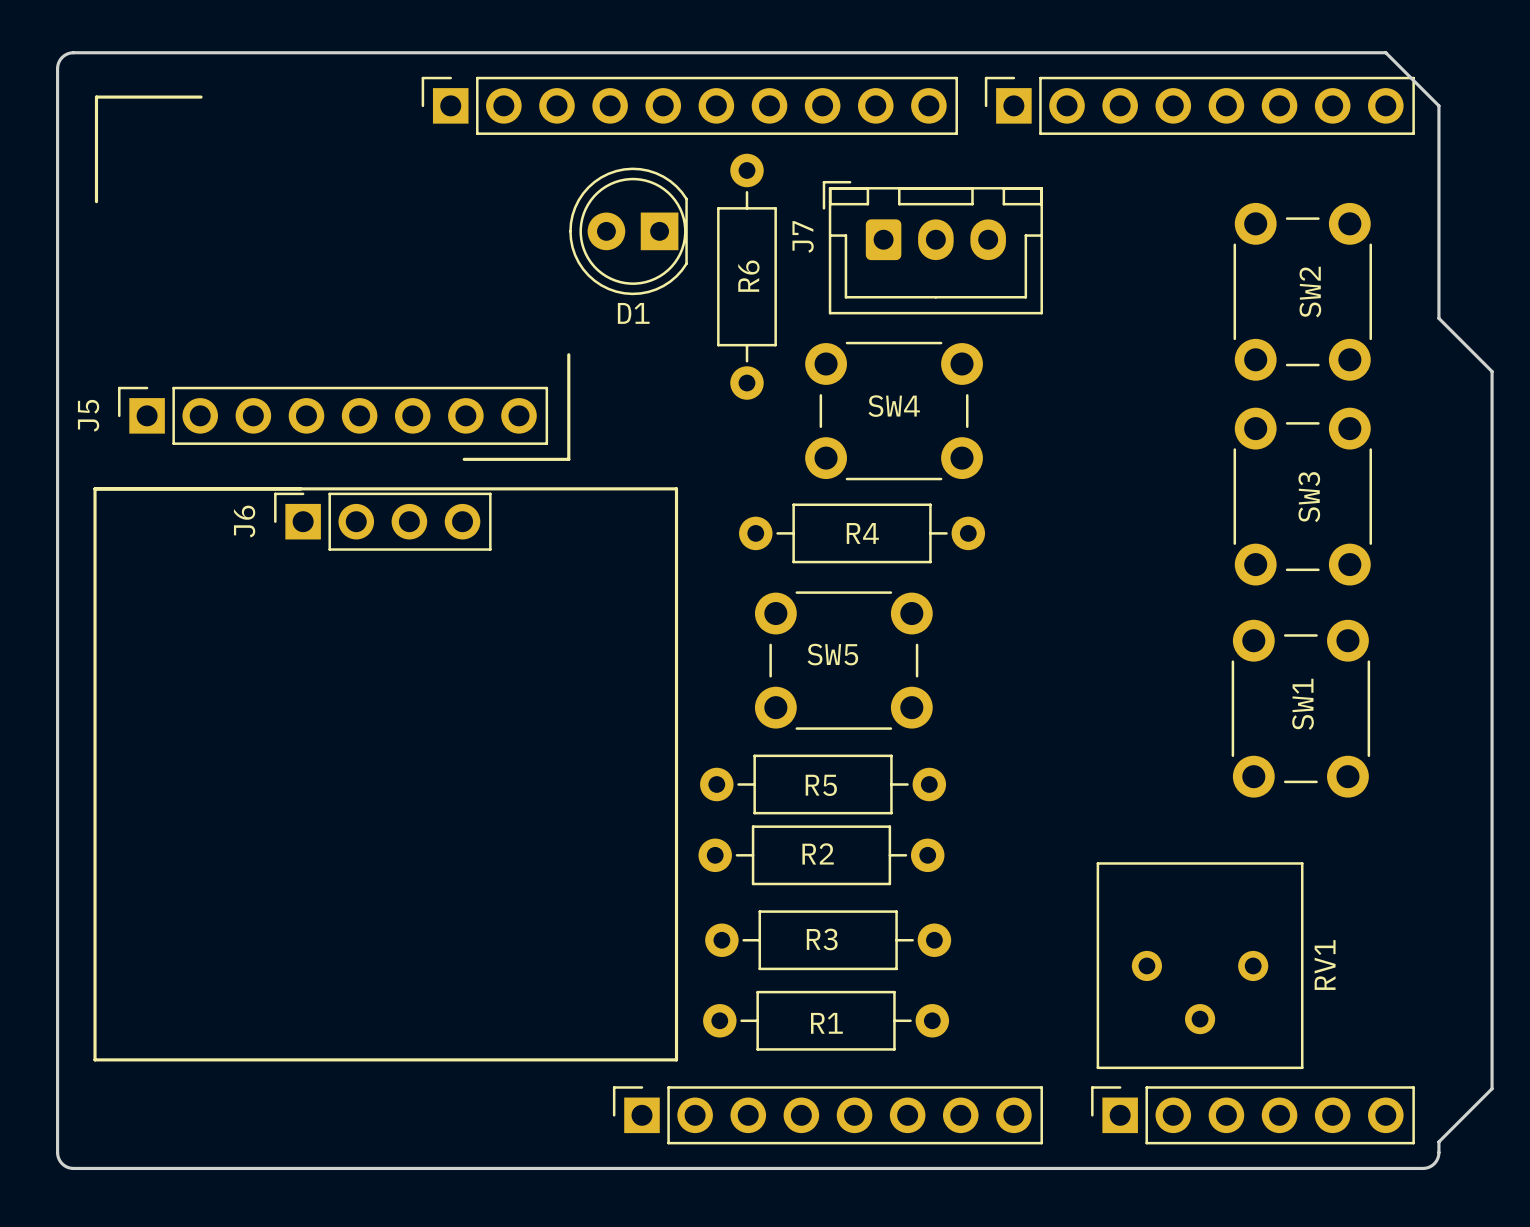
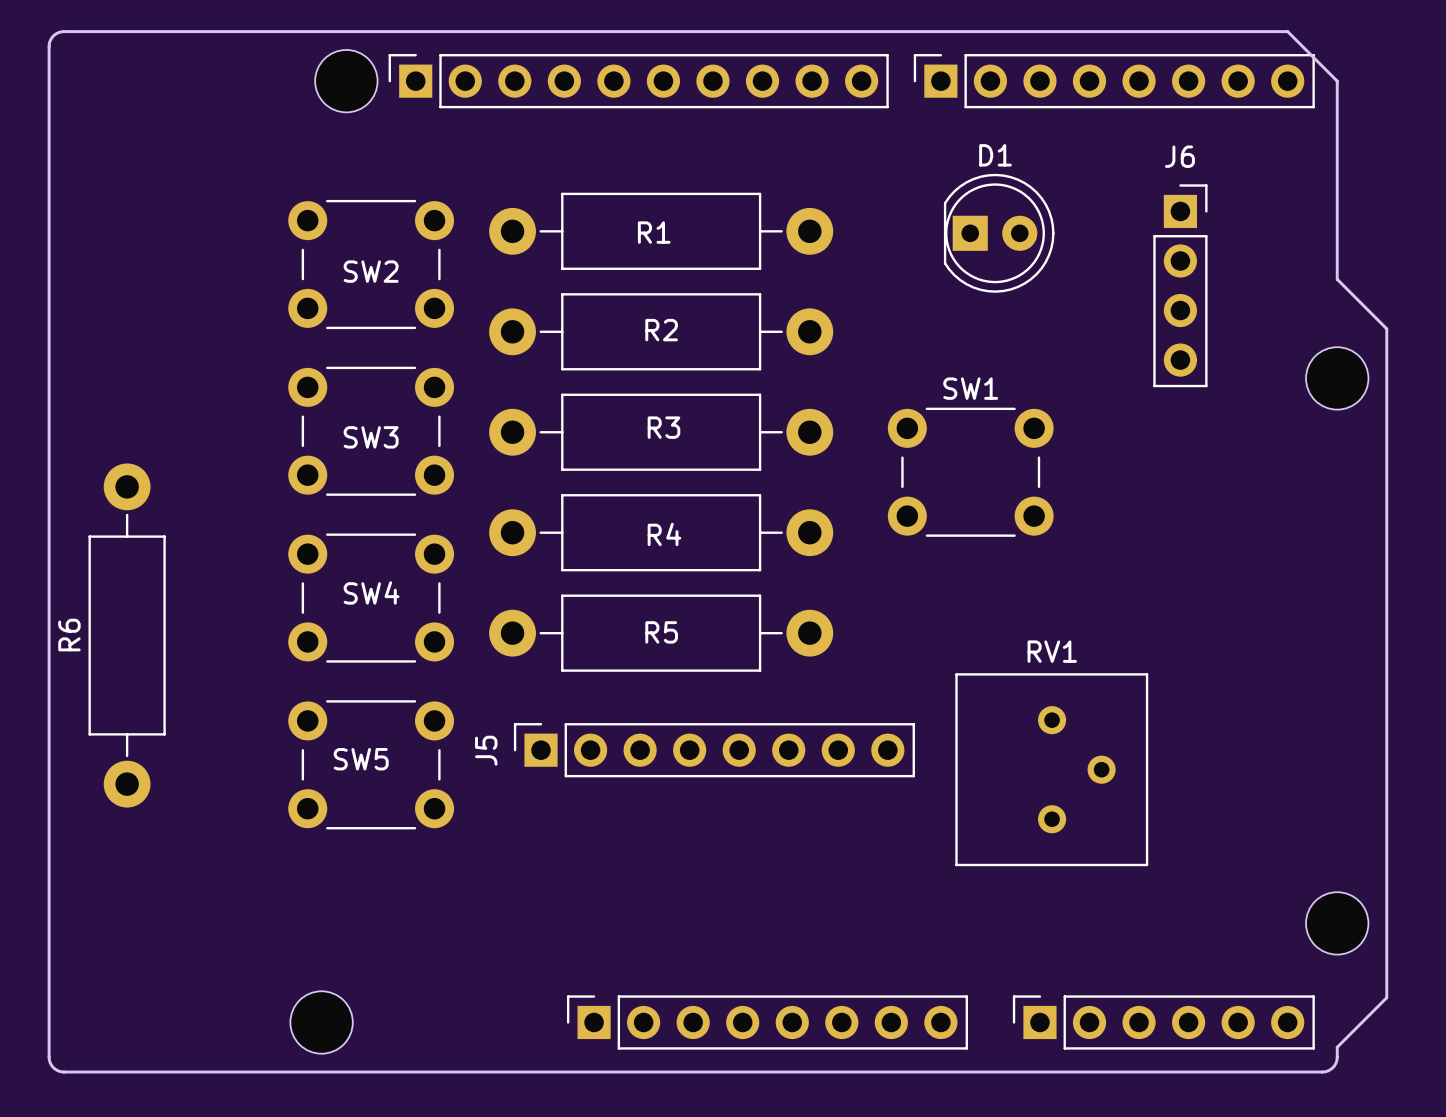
line: (201, 97) (96, 97) (96, 201) -> none
part: none -> (346, 81)
R6 footprint: [717, 153, 777, 400] -> [88, 463, 166, 808]
D1 rotation: 0° (628, 231) -> 180° (999, 233)
D1 position: (628, 231) -> (999, 233)
J7: (932, 247) -> none
R6 name position: R6 (748, 276) -> R6 (69, 635)
SW2 rotation: 0° (1302, 291) -> 90° clockwise (371, 264)
SW2 position: (1302, 291) -> (371, 264)
line: (568, 354) (568, 459) (464, 459) -> none
SW4 position: (894, 411) -> (371, 598)
J5 position: (333, 415) -> (714, 750)
part: none -> (1337, 378)
line: (95, 488) (676, 488) (676, 1059) (95, 1059) (95, 488) -> none
SW3 rotation: 0° (1302, 496) -> 90° clockwise (371, 431)
SW3 position: (1302, 496) -> (371, 431)
R4 footprint: [739, 503, 986, 564] -> [489, 494, 834, 572]
J6 rotation: 0° (382, 521) -> 90° clockwise (1180, 285)
J6 position: (382, 521) -> (1180, 285)
SW5 position: (843, 660) -> (371, 764)
SW1 name position: SW1 (1303, 704) -> SW1 (970, 388)
SW1 rotation: 0° (1300, 708) -> 90° clockwise (970, 472)
SW1 position: (1300, 708) -> (970, 472)
R5 footprint: [700, 754, 947, 815] -> [489, 594, 834, 672]
R2 footprint: [698, 825, 945, 886] -> [489, 293, 834, 371]
R3 footprint: [705, 910, 952, 971] -> [489, 393, 834, 471]
RV1 rotation: 0° (1200, 965) -> 90° counterclockwise (1051, 769)
RV1 position: (1200, 965) -> (1051, 769)
R1 footprint: [703, 990, 950, 1051] -> [489, 192, 834, 270]
part: none -> (1337, 923)
part: none -> (321, 1022)

